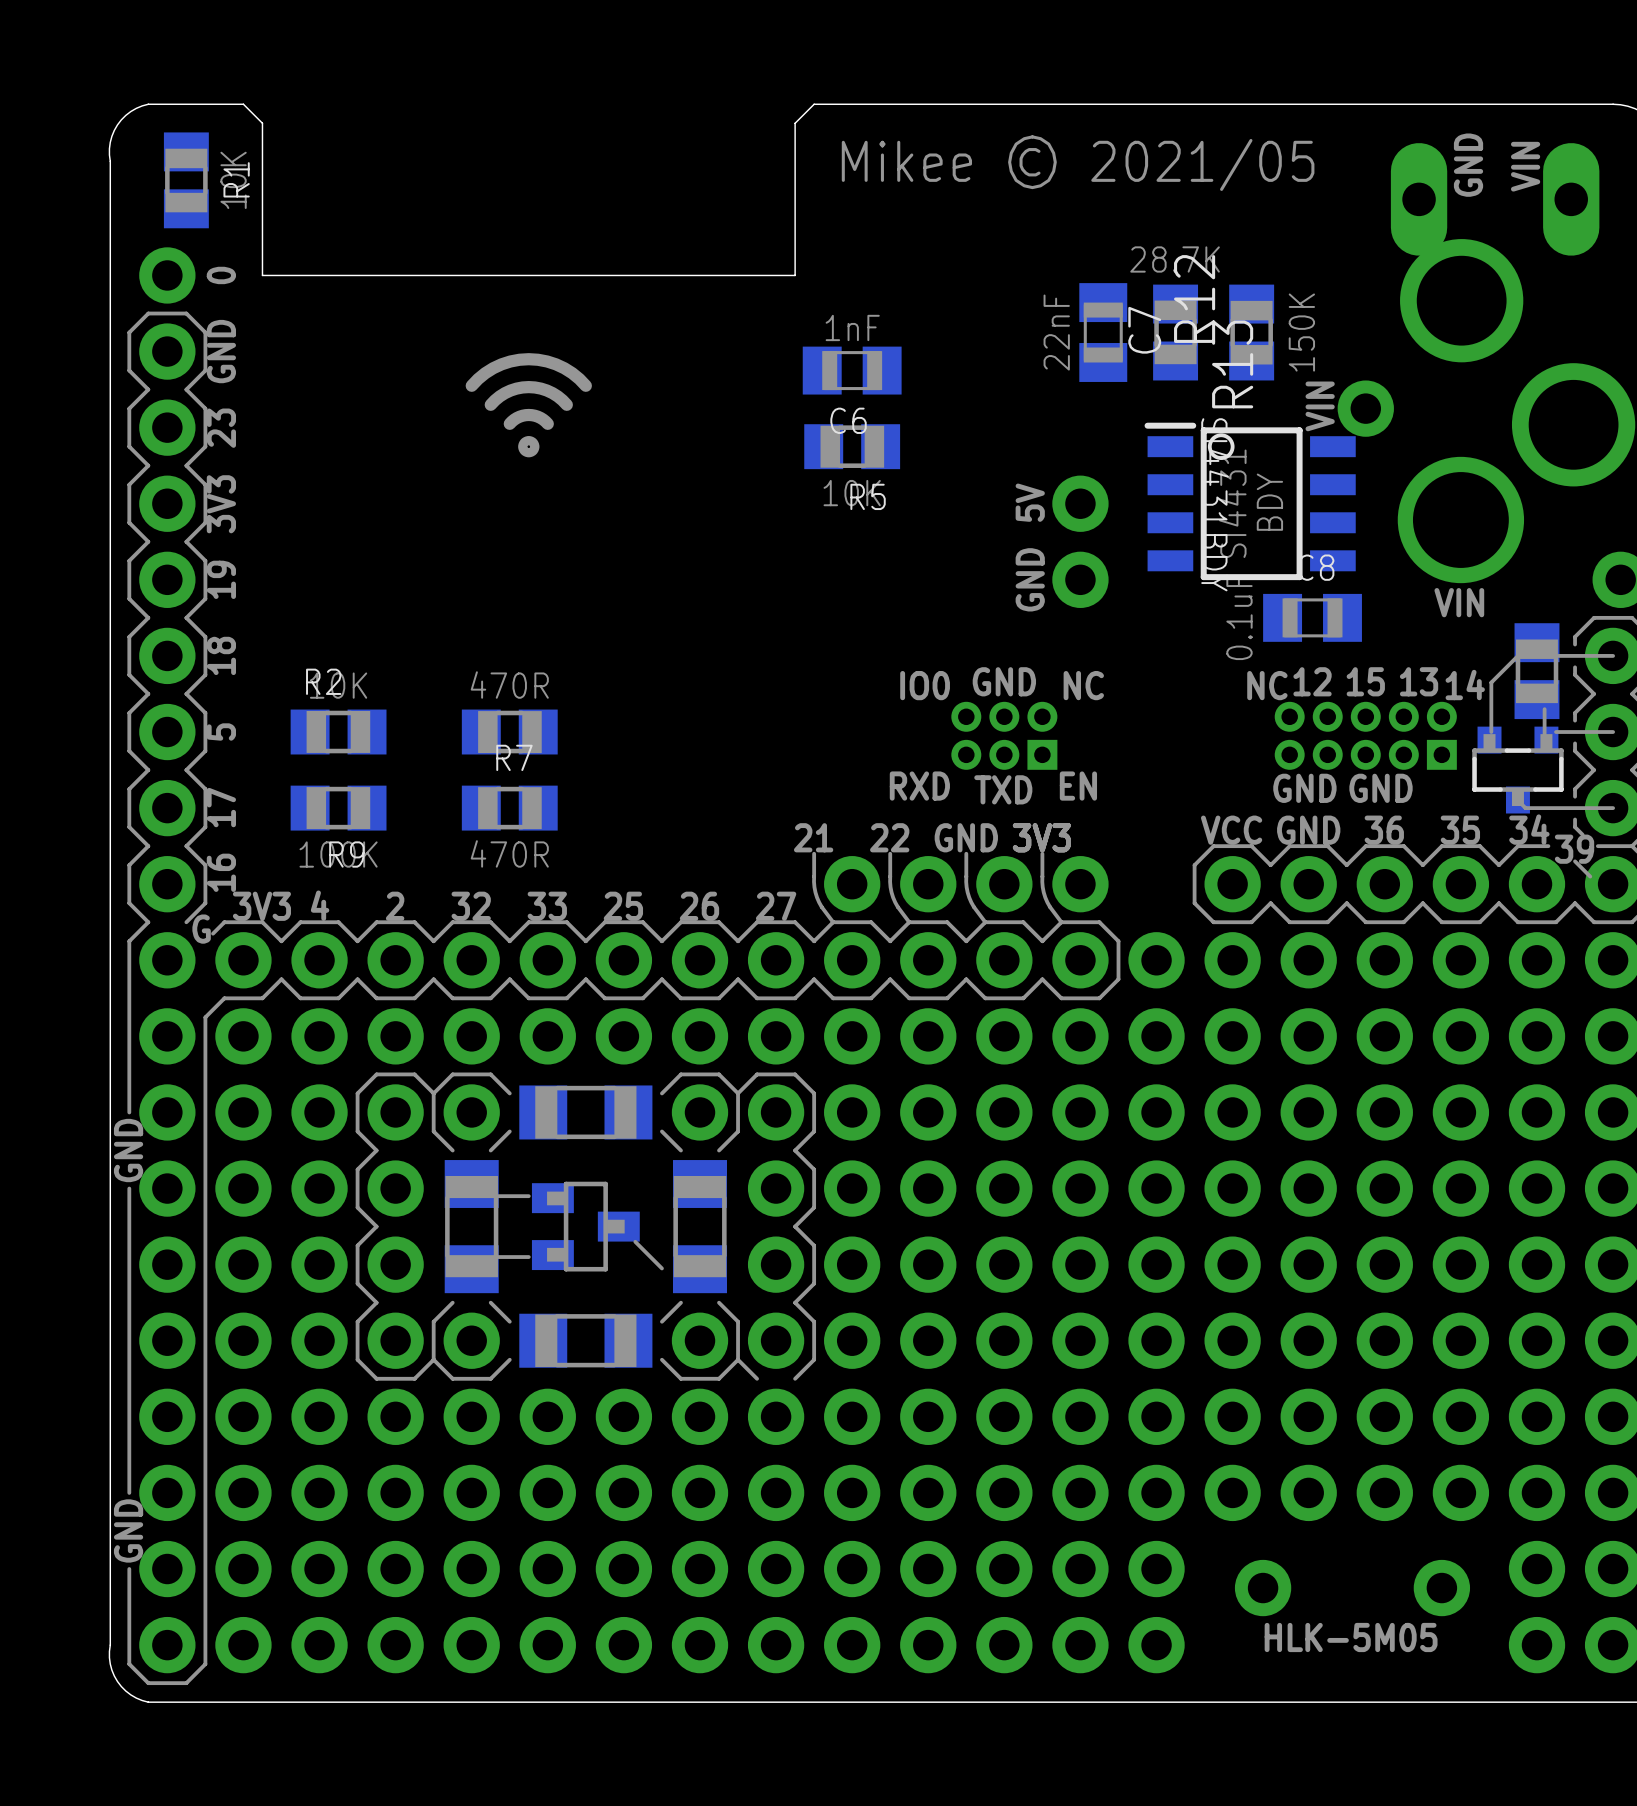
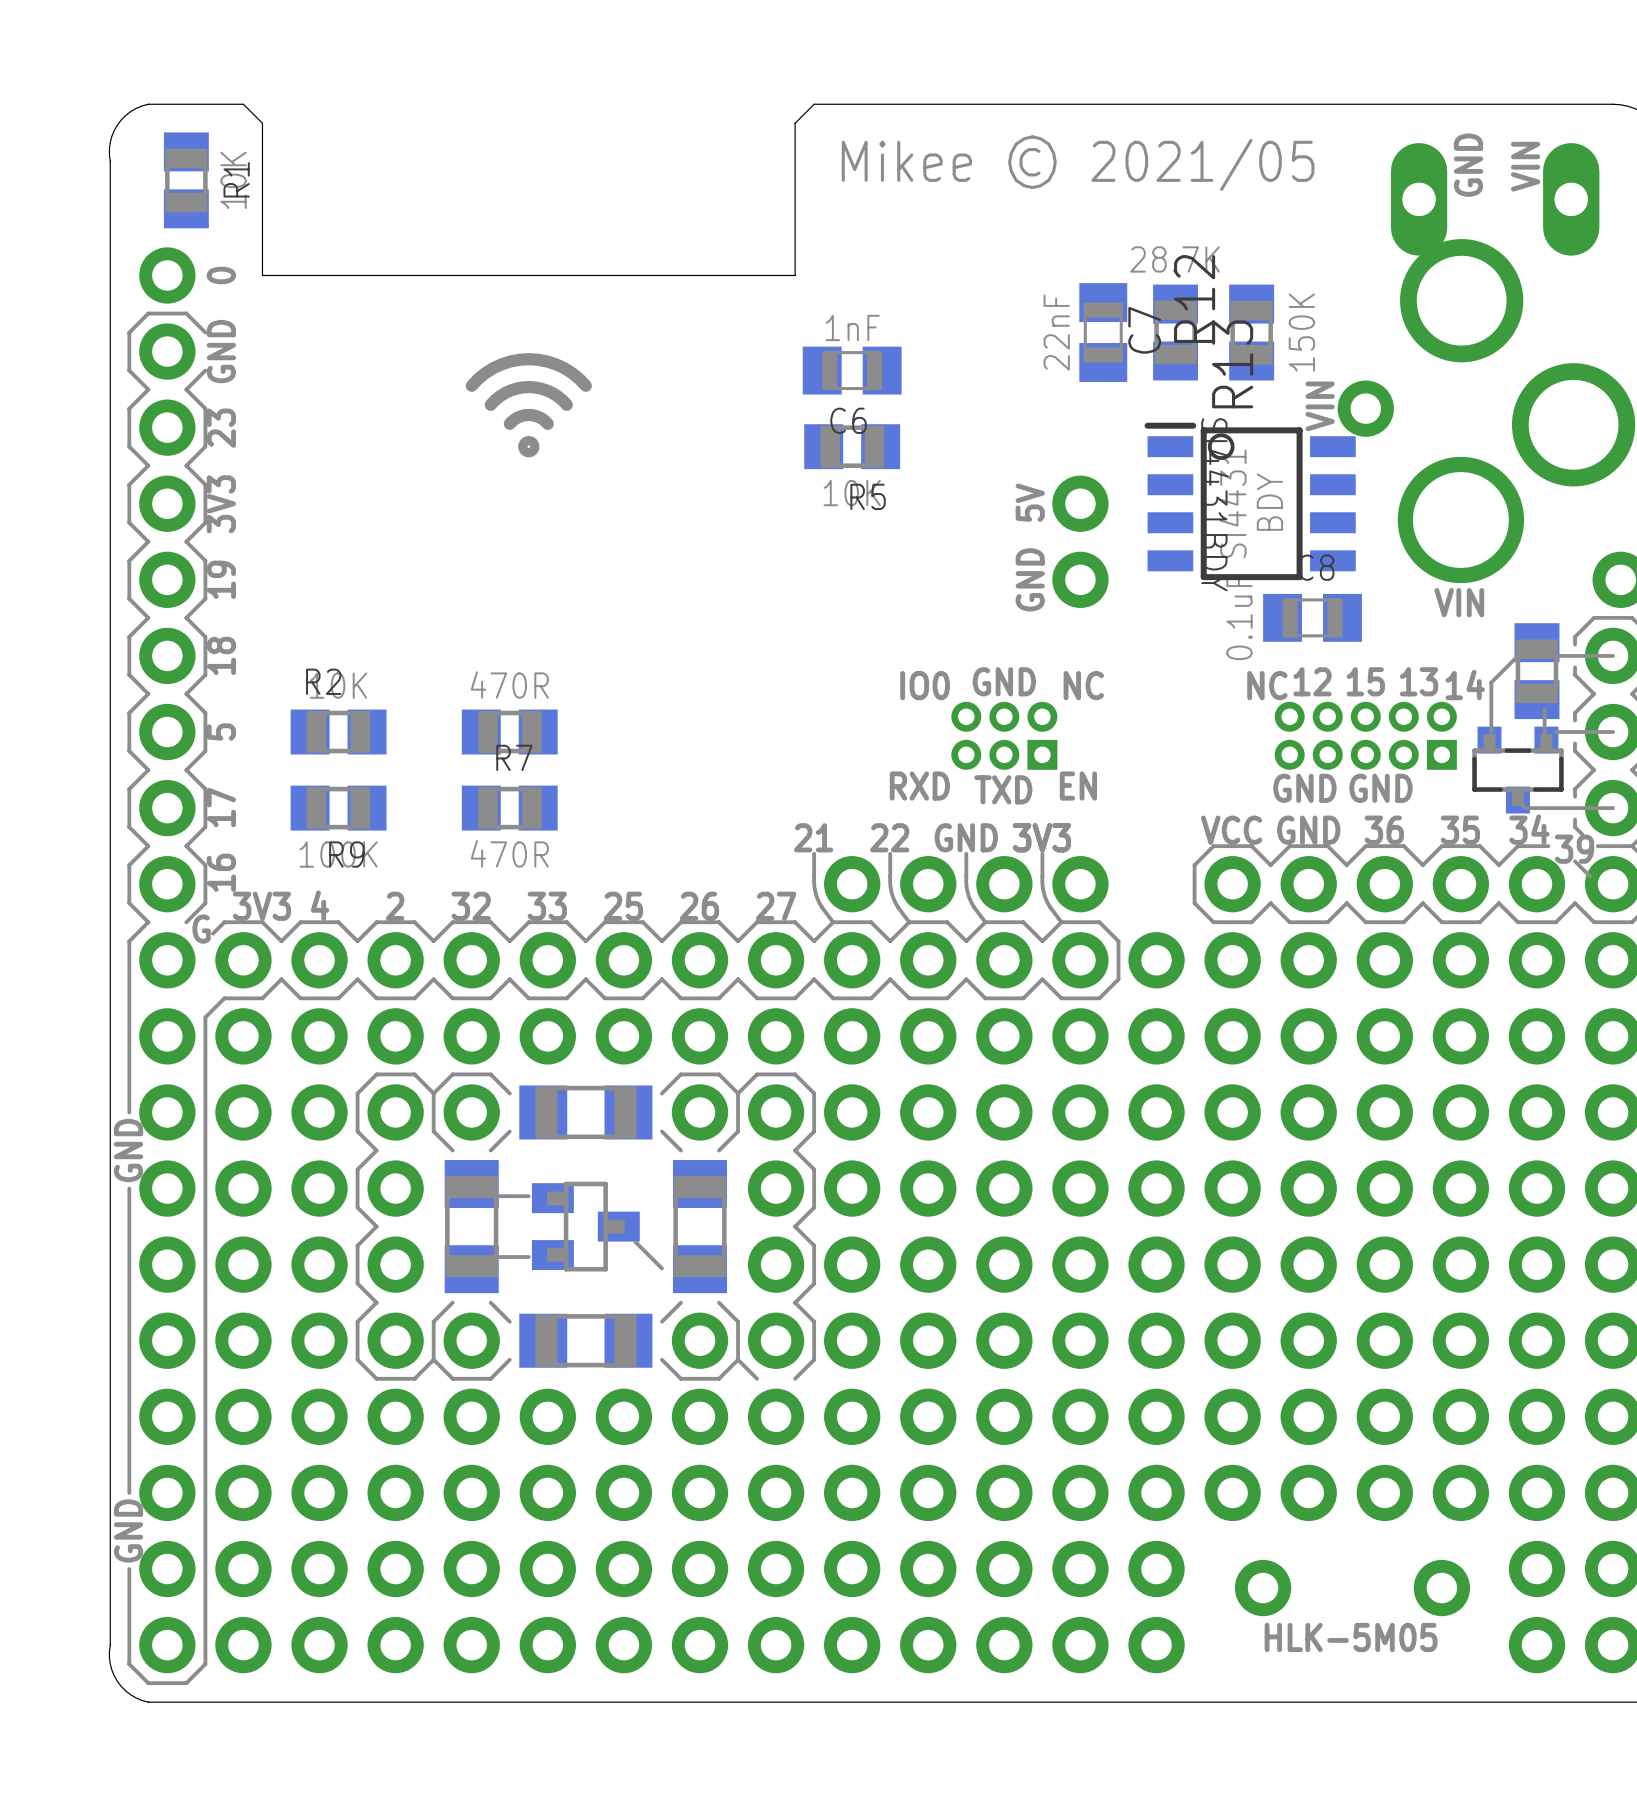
line: (205, 332) (205, 370) -> none

